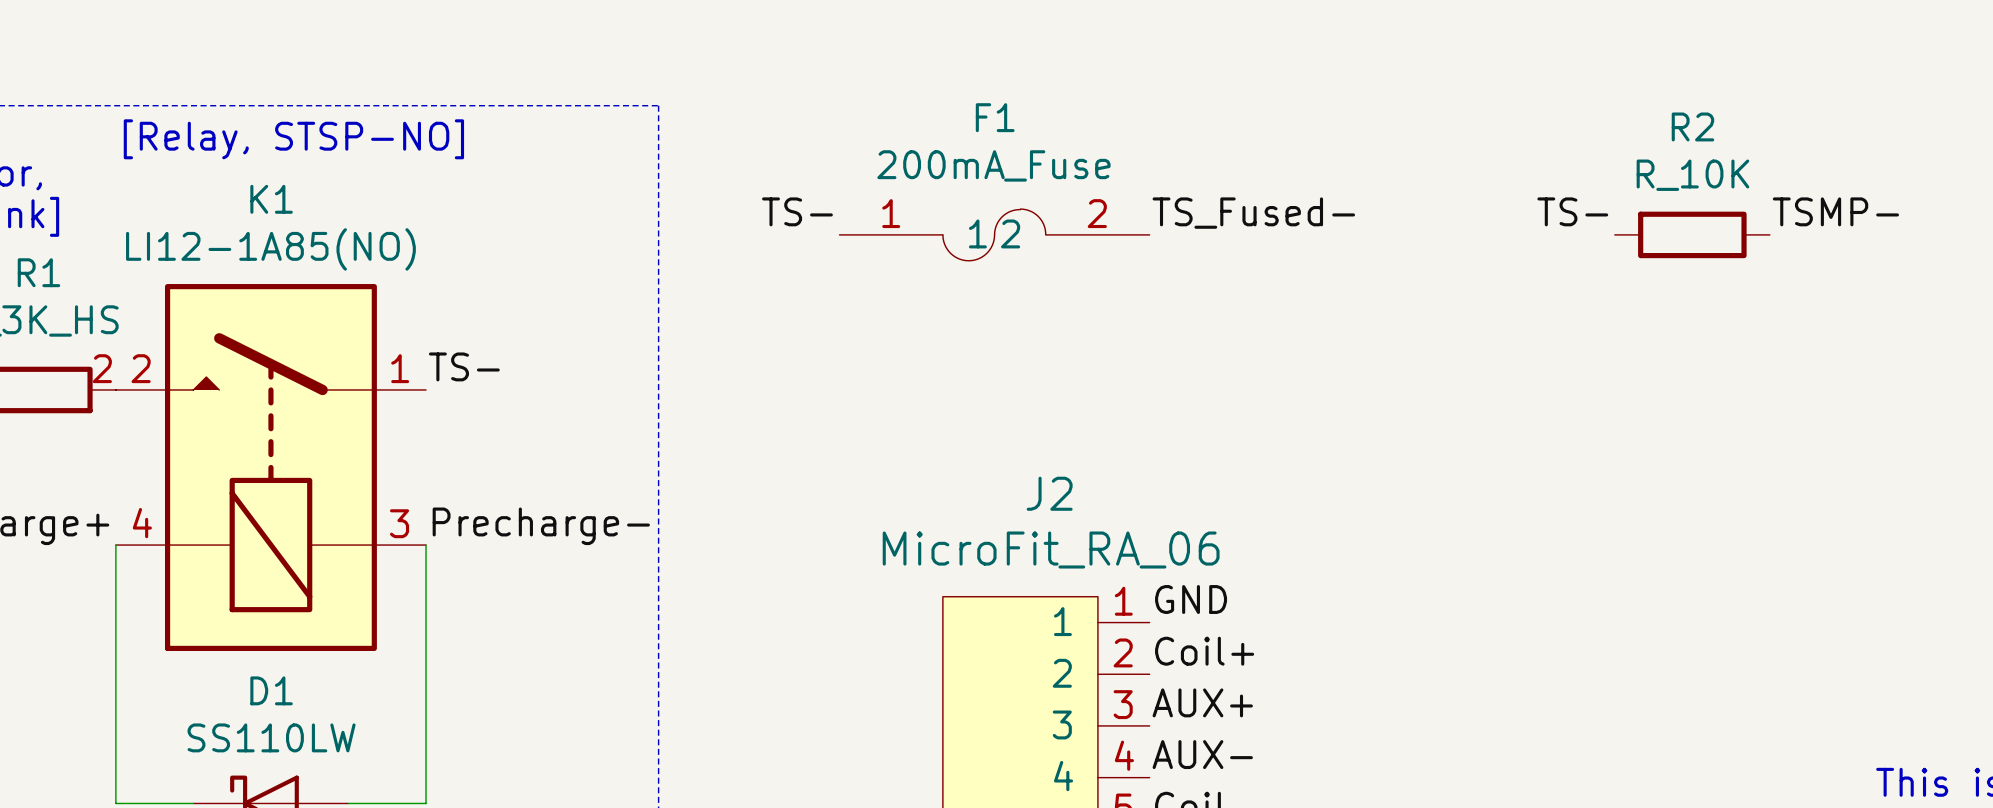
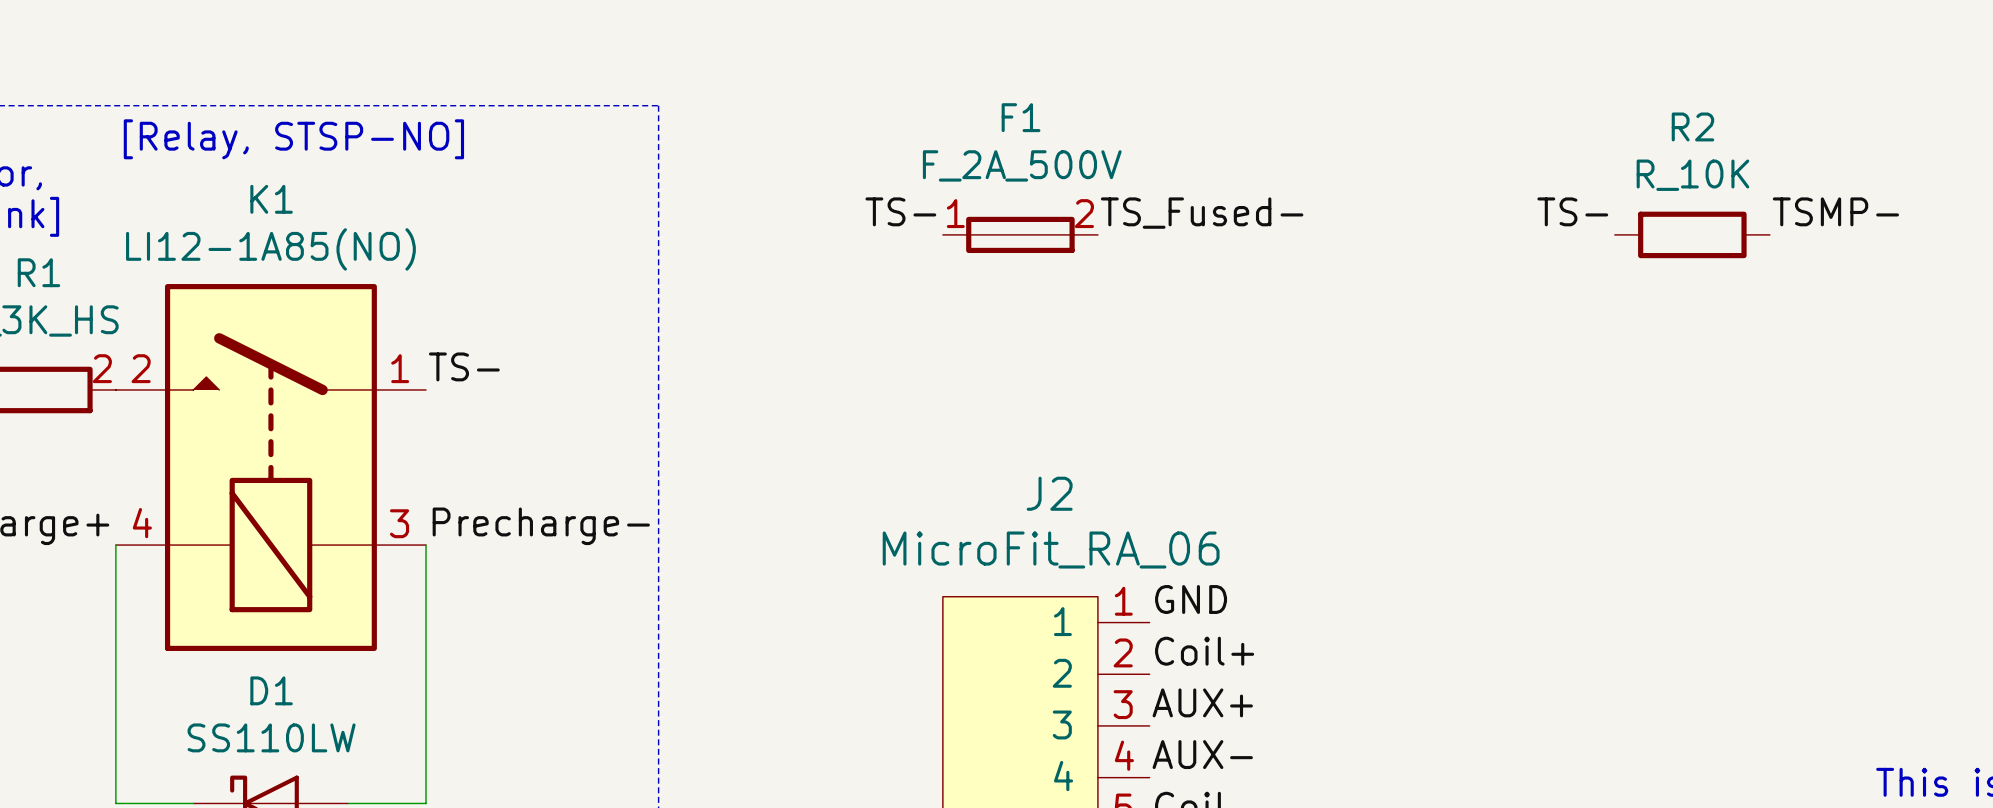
F1 value: 200mA_Fuse (993, 165) -> F_2A_500V (1022, 165)
F1 symbol: [839, 209, 1150, 261] -> [942, 216, 1098, 254]
label position: TS- (797, 211) -> TS- (900, 211)
label position: TS_Fused- (1253, 213) -> TS_Fused- (1202, 213)

